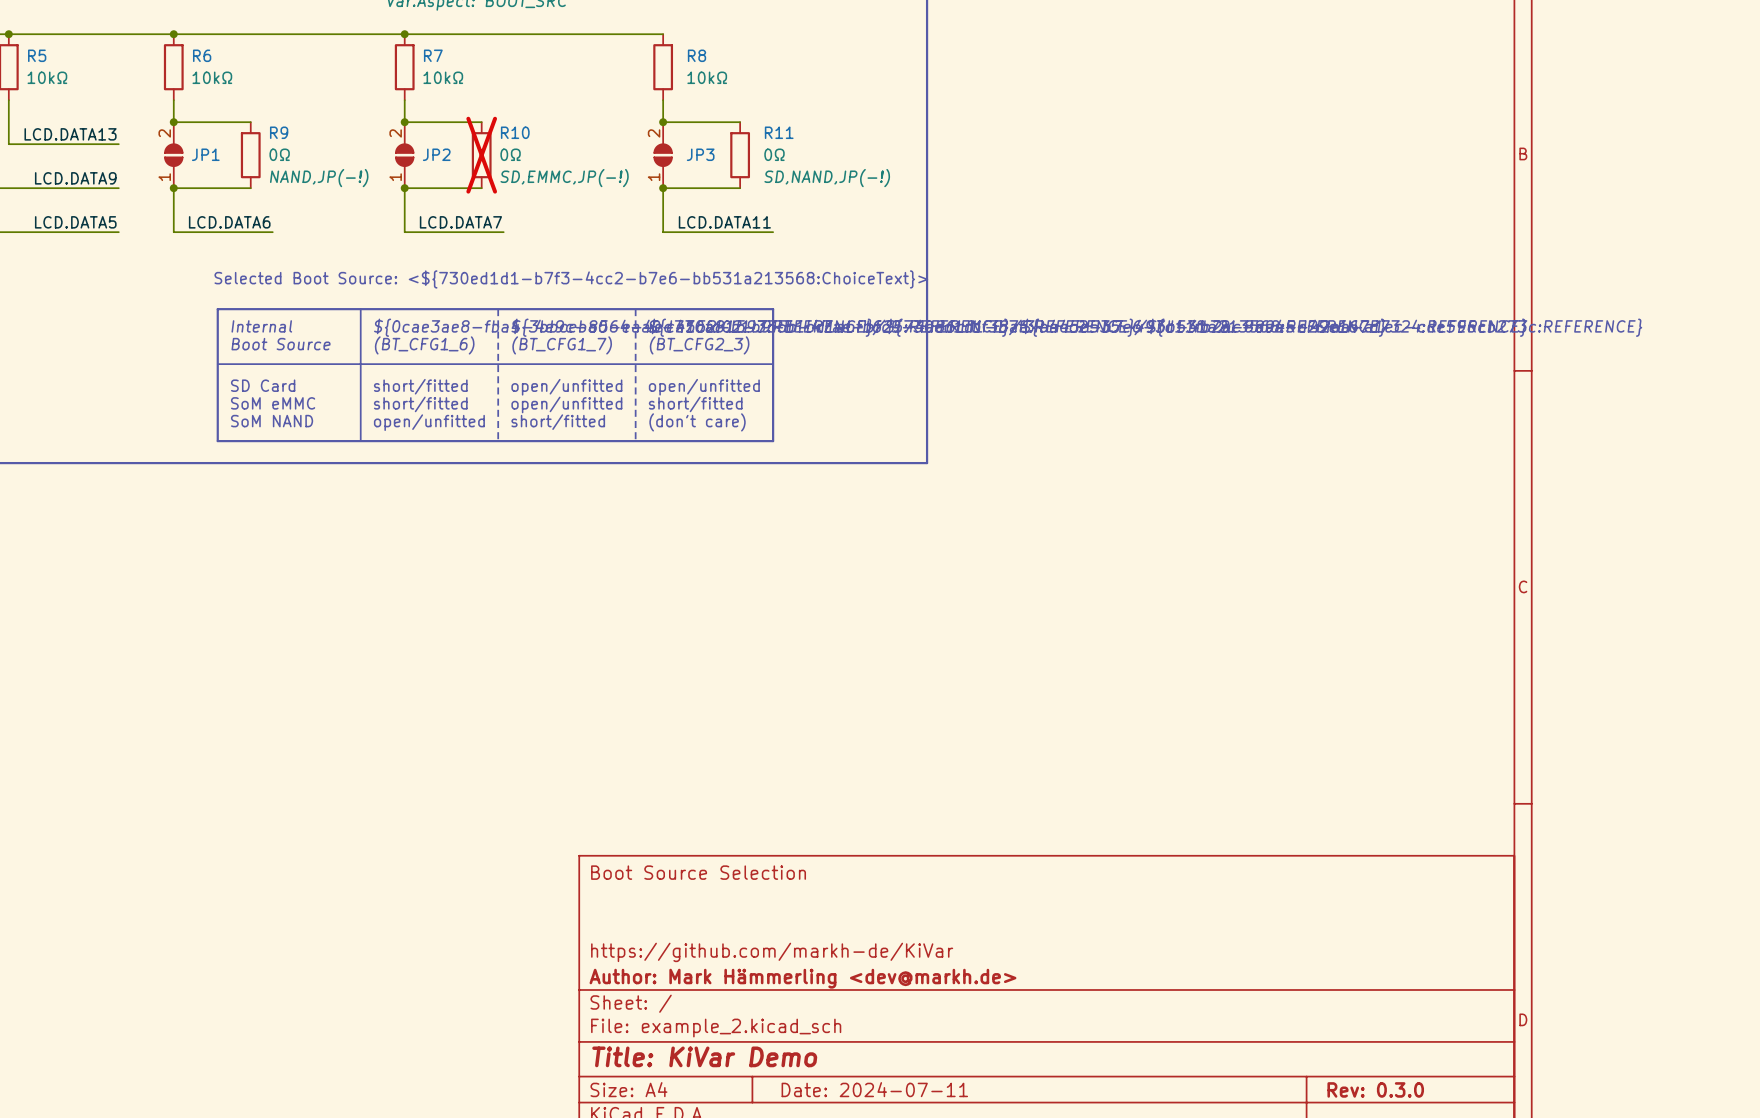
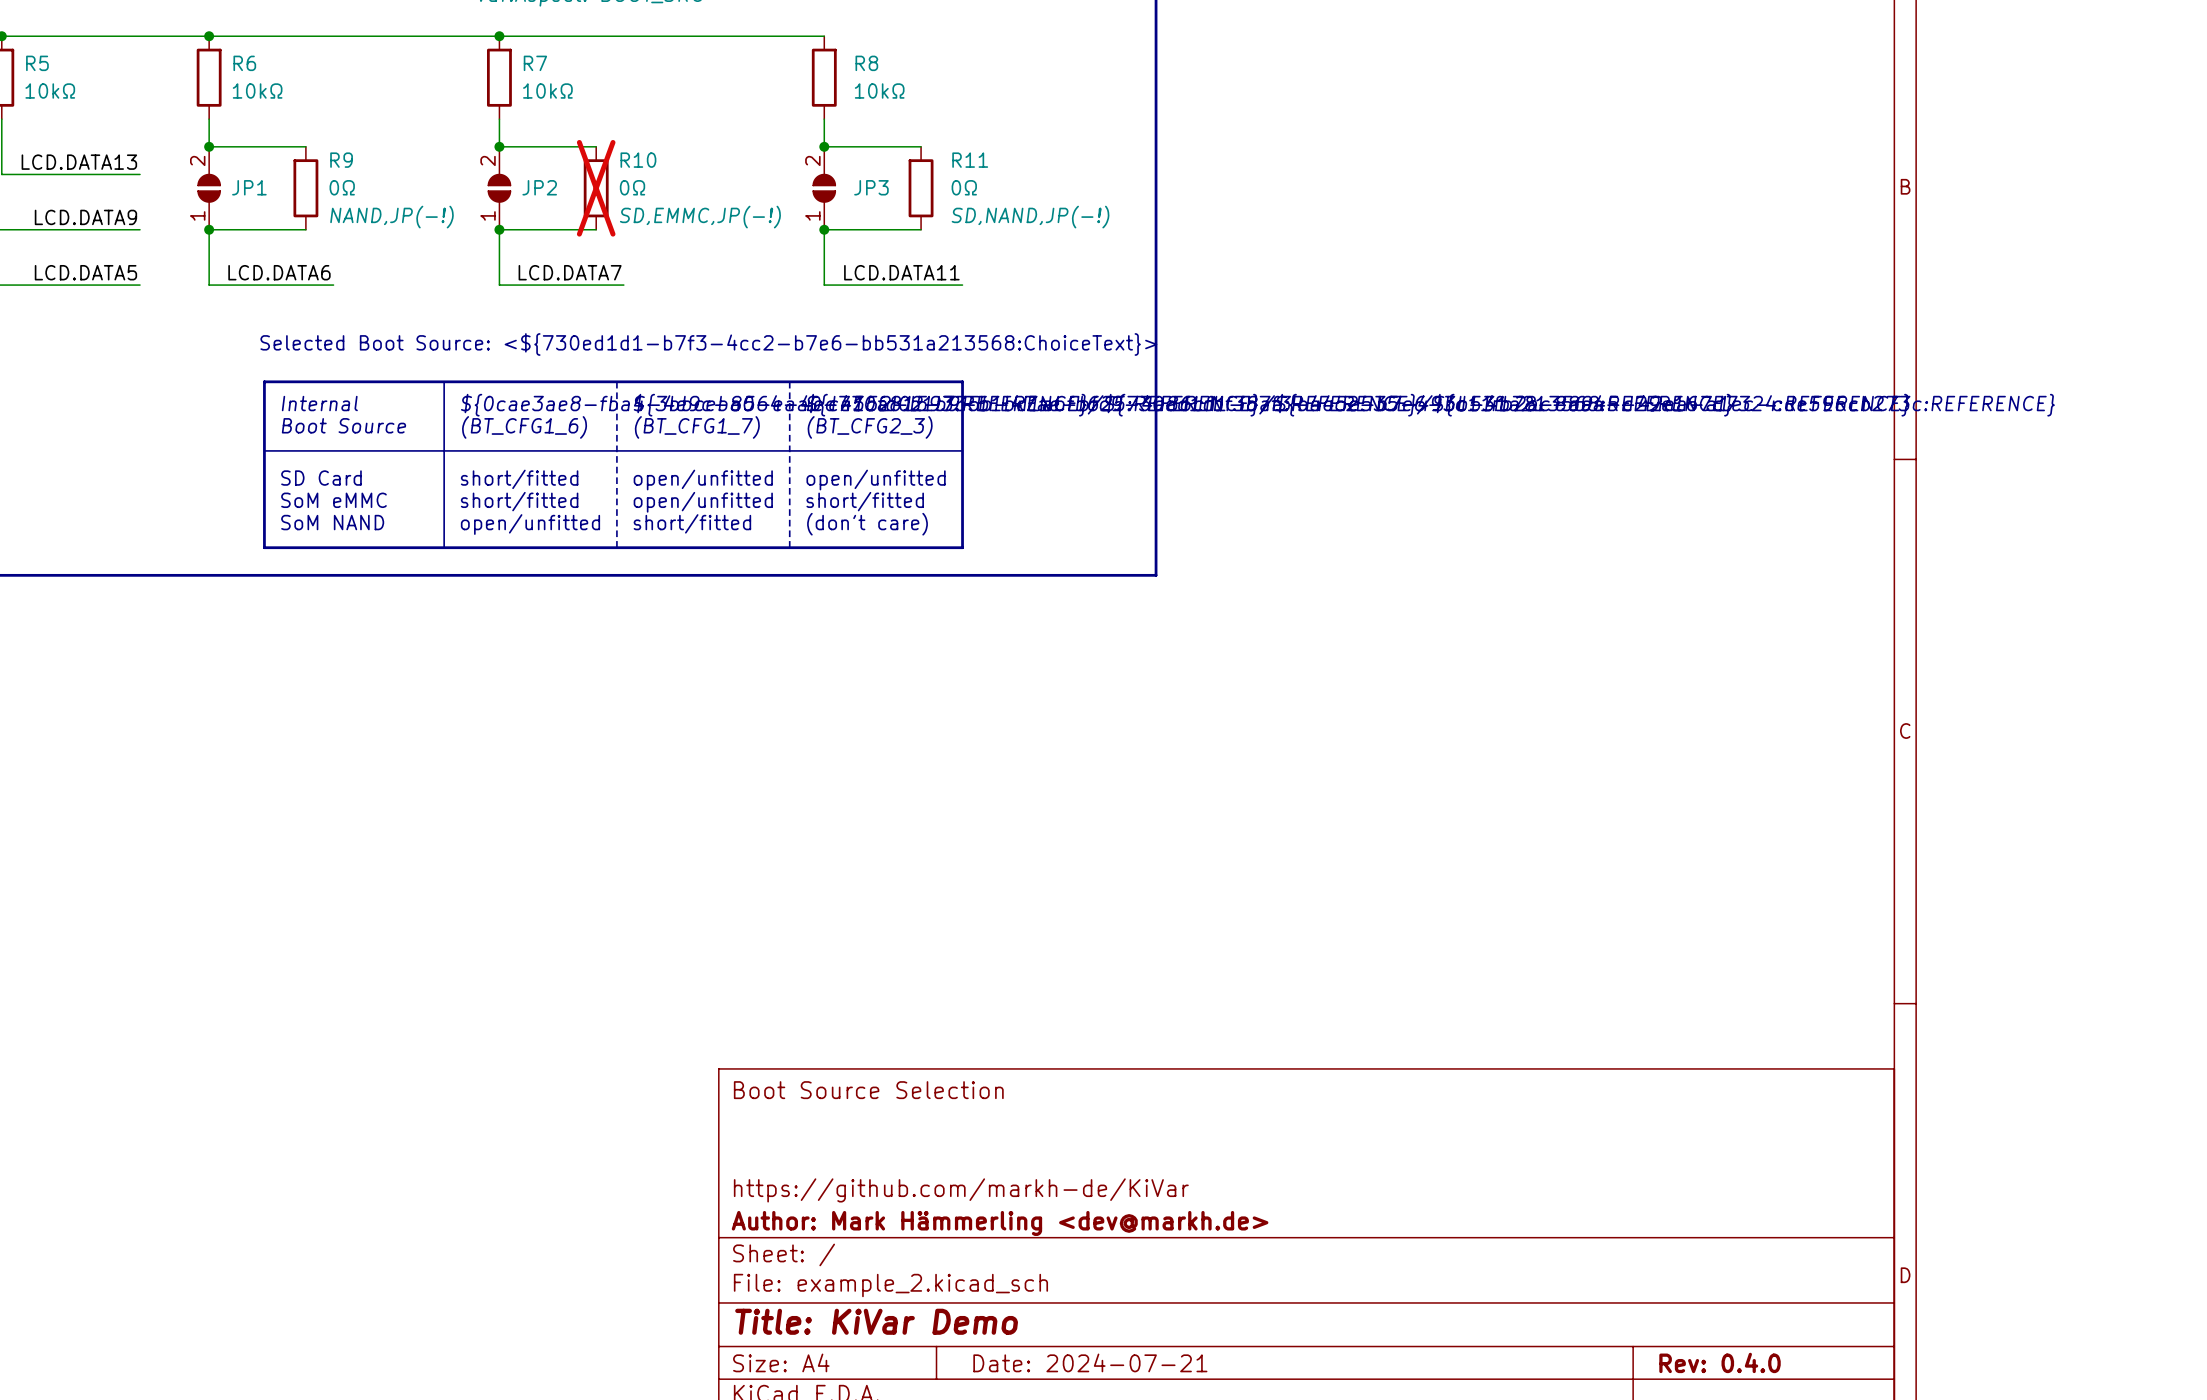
title block: Date: 2024-07-11 (874, 1089) -> Date: 2024-07-21 (1090, 1362)
title block: Rev: 0.3.0 (1375, 1089) -> Rev: 0.4.0 (1720, 1362)

